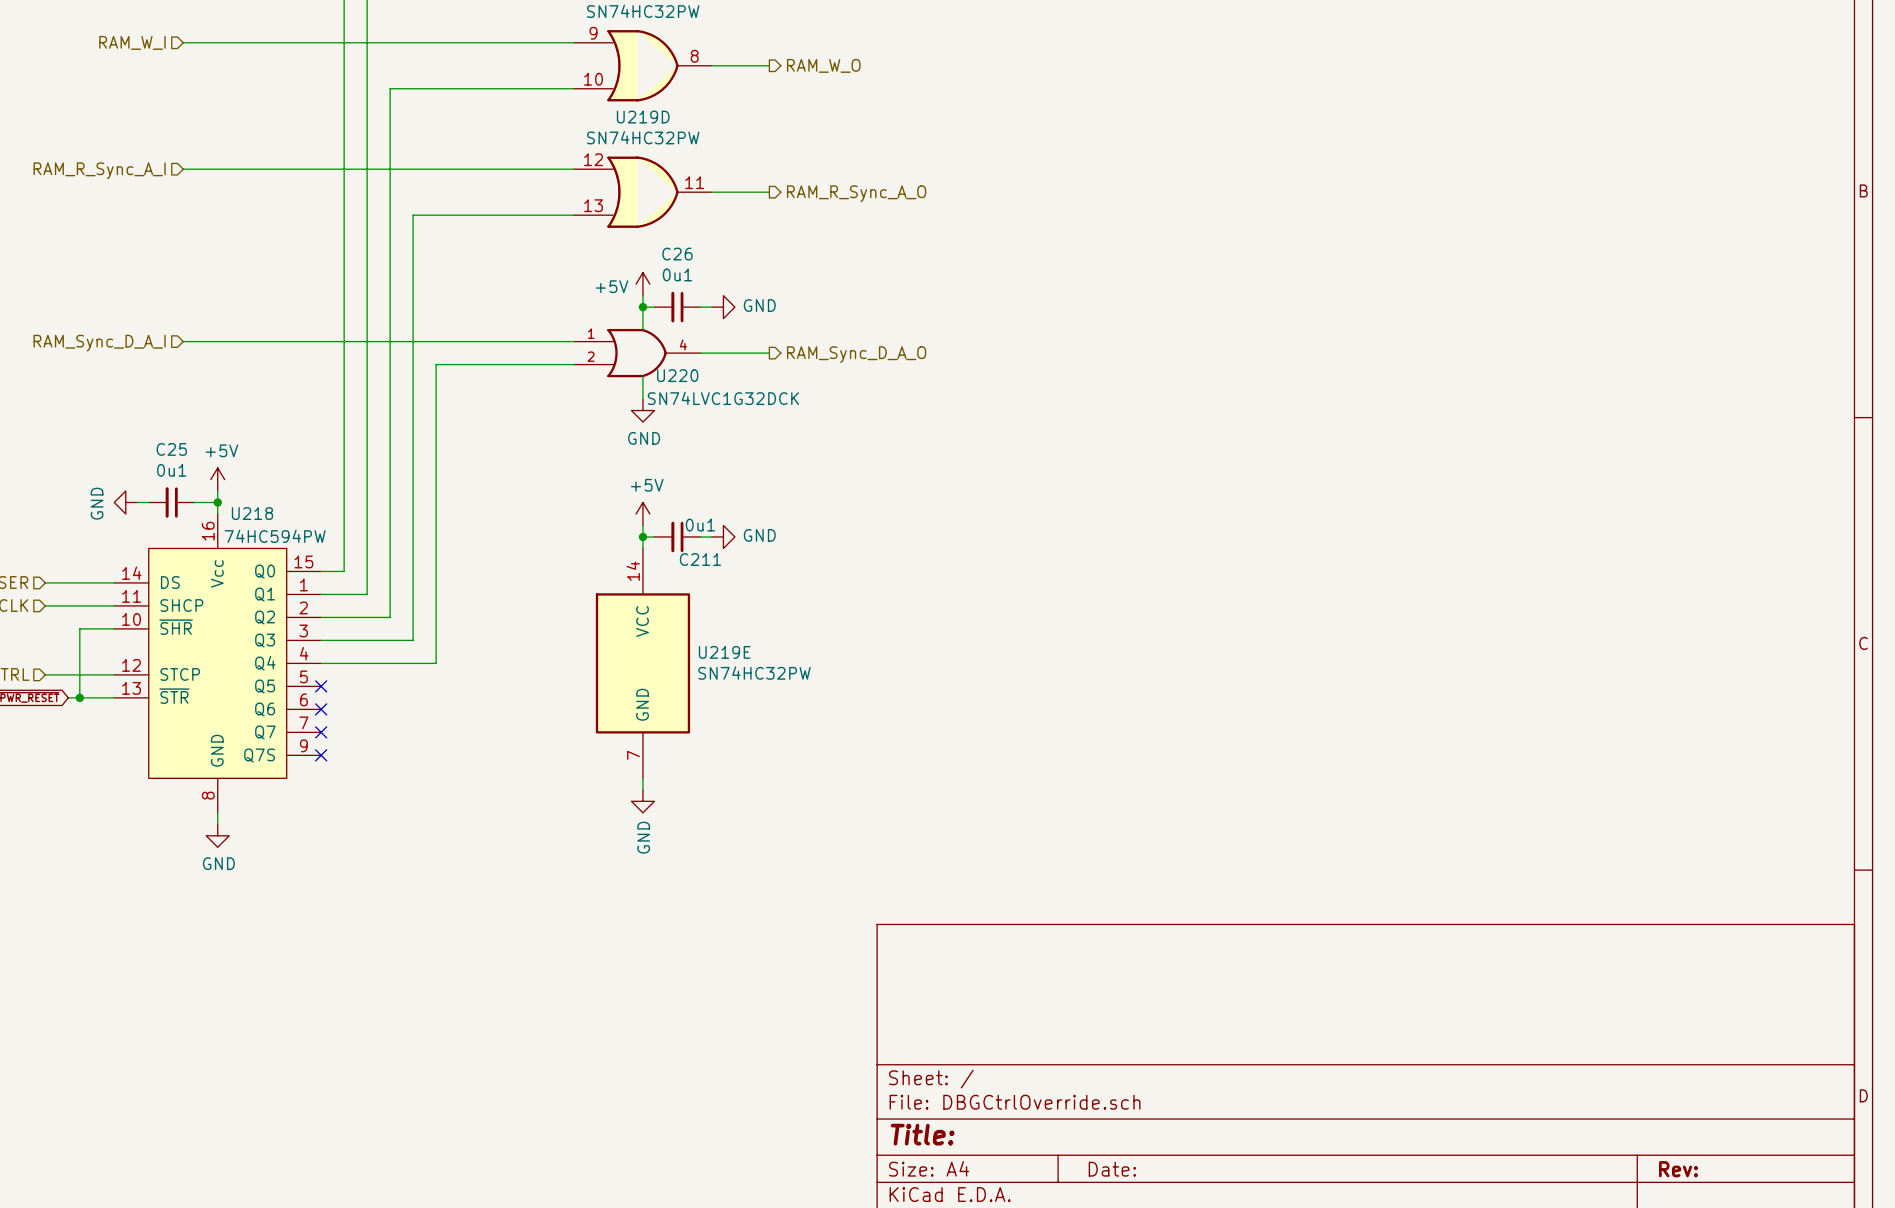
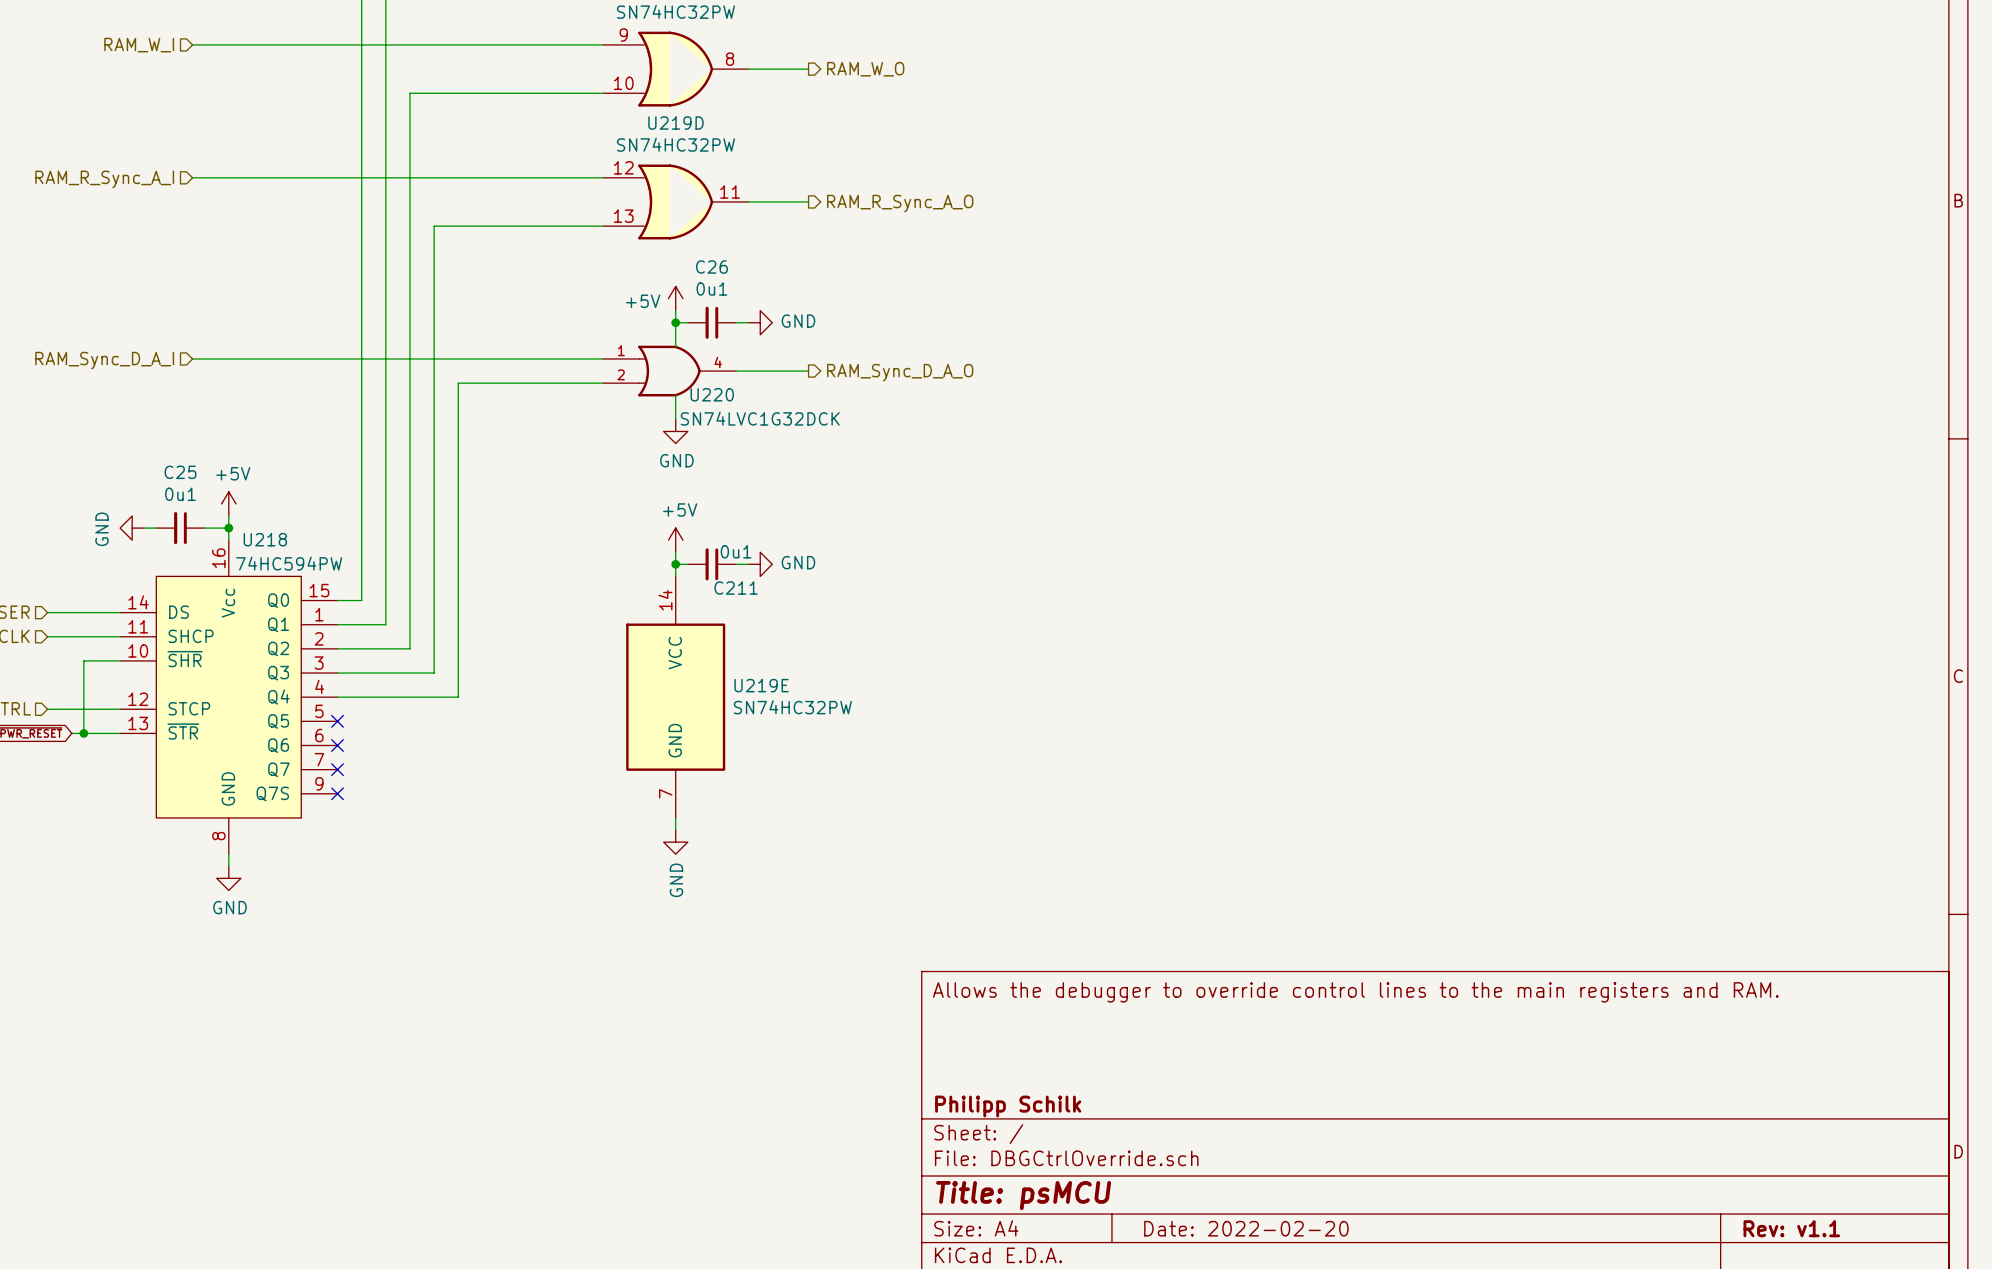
title block: none -> Allows the debugger to override control lines to the main registers and RAM. (1355, 992)
title block: none -> Philipp Schilk (1008, 1106)
title block: Title: (922, 1134) -> Title: psMCU (1023, 1195)
title block: Date: (1112, 1169) -> Date: 2022-02-20 (1246, 1228)
title block: Rev: (1678, 1169) -> Rev: v1.1 (1791, 1228)

